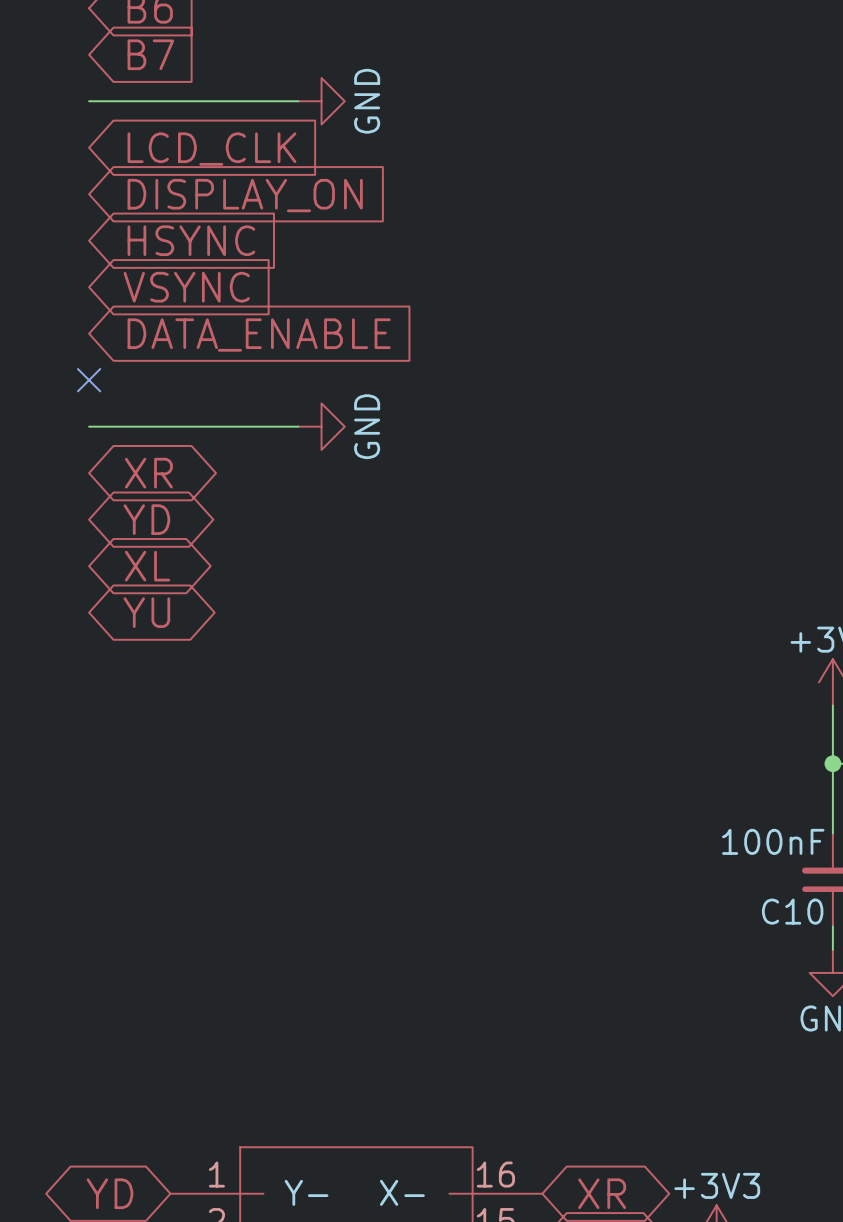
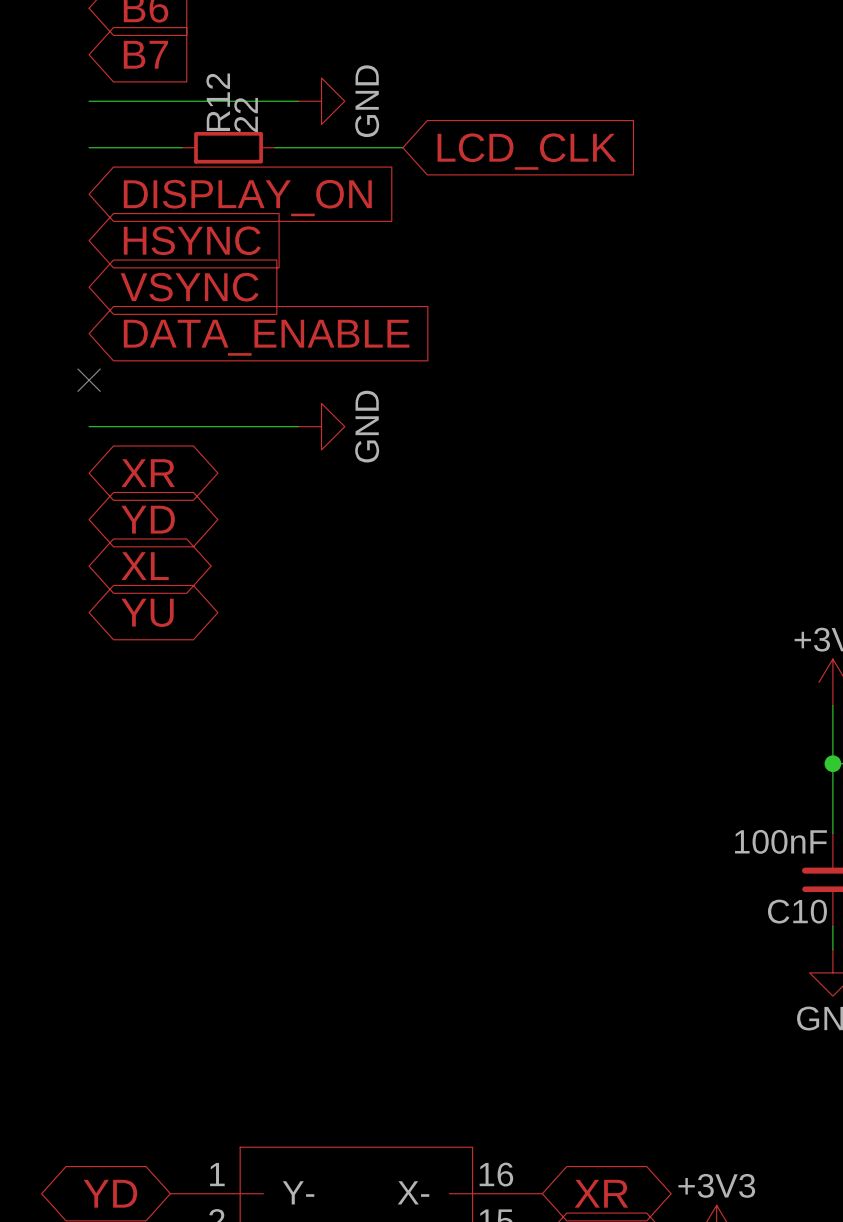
wire: none -> (89, 147) (182, 147)
R12: none -> 22 (228, 147)
wire: none -> (275, 147) (402, 147)
global label position: LCD_CLK (211, 149) -> LCD_CLK (526, 151)

